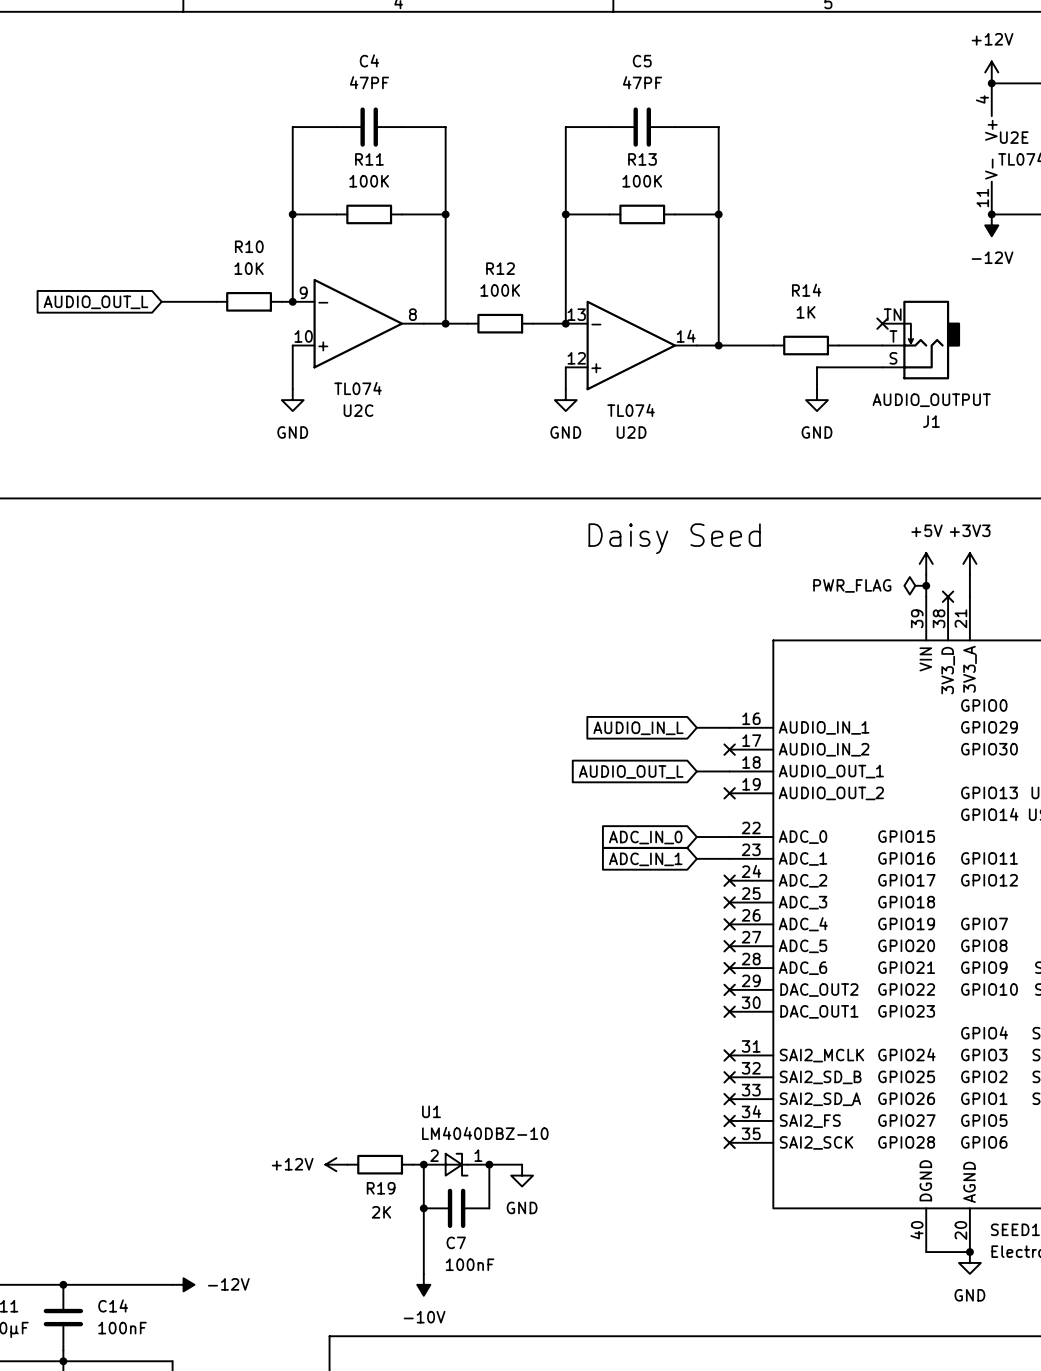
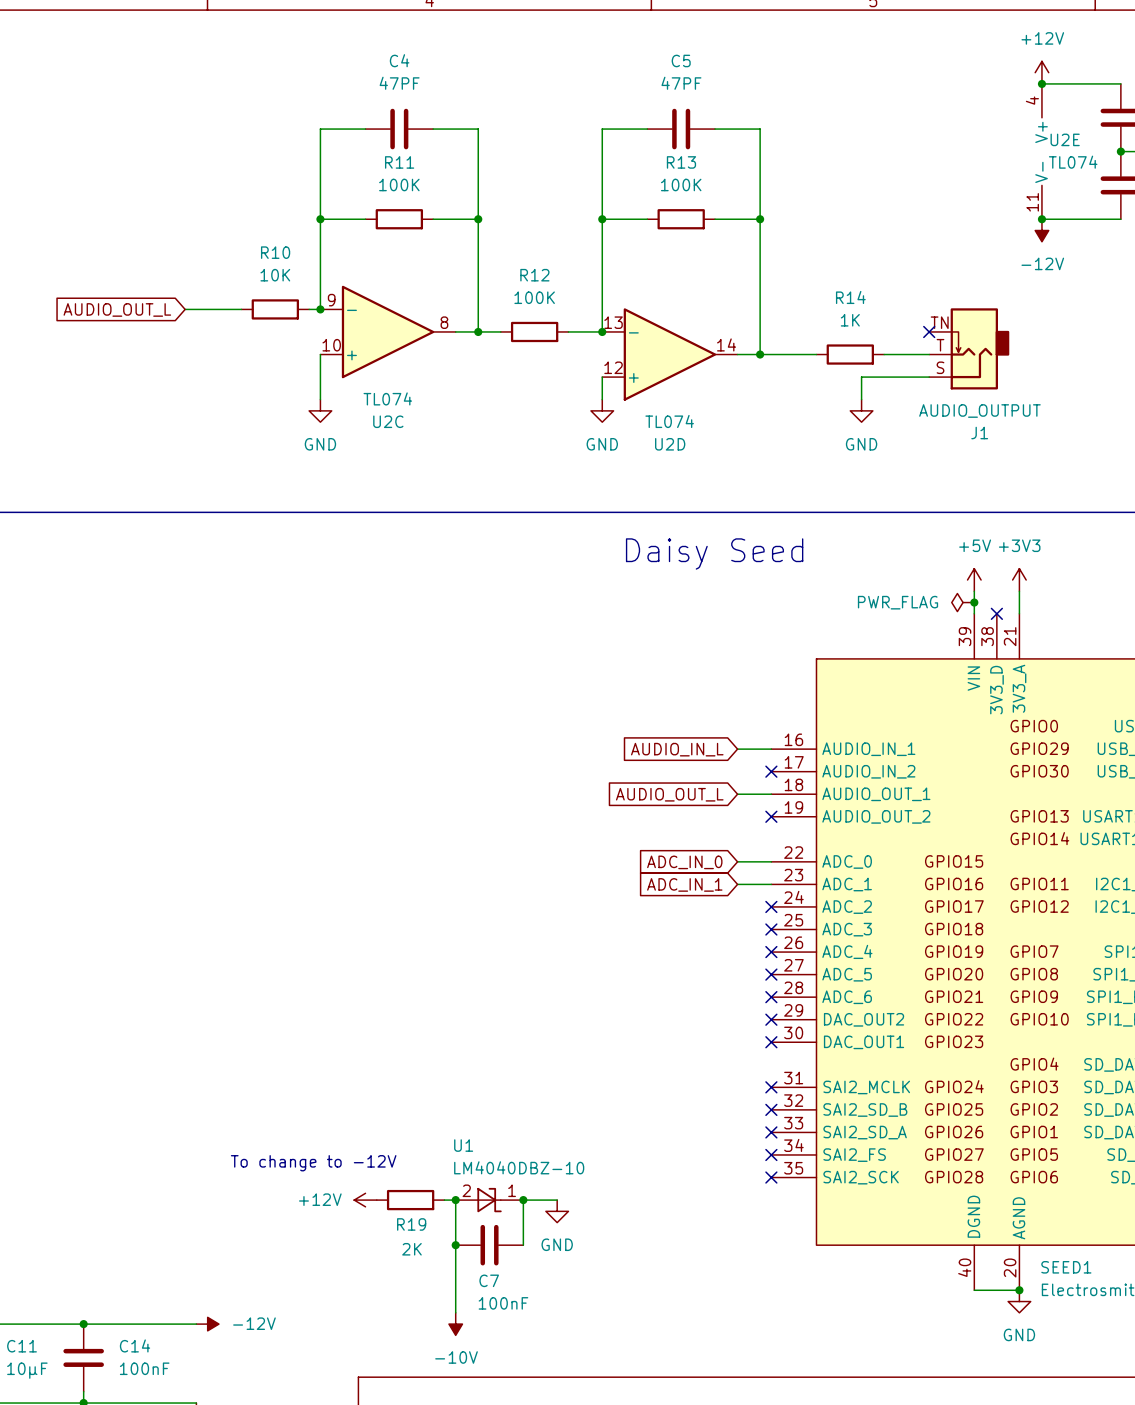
text: none -> To change to -12V (313, 1163)

